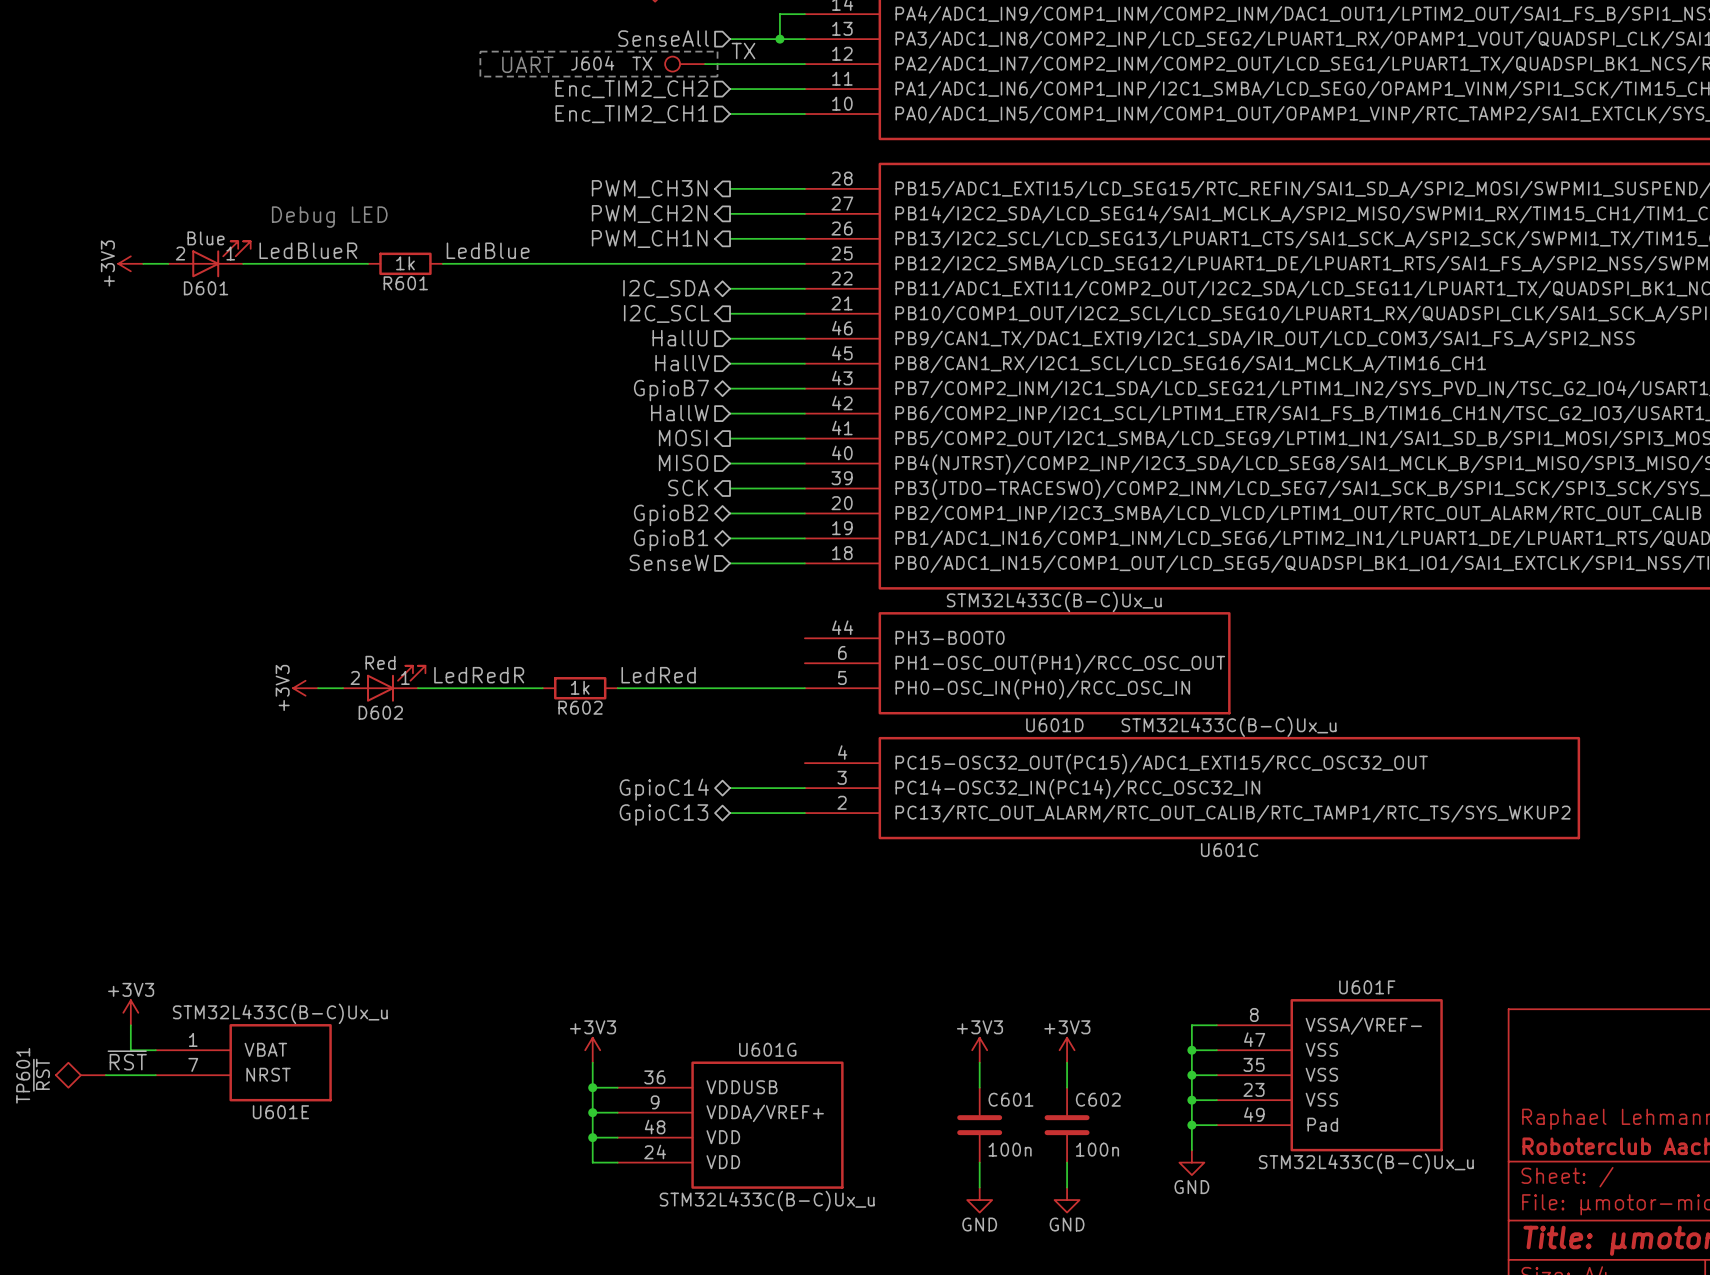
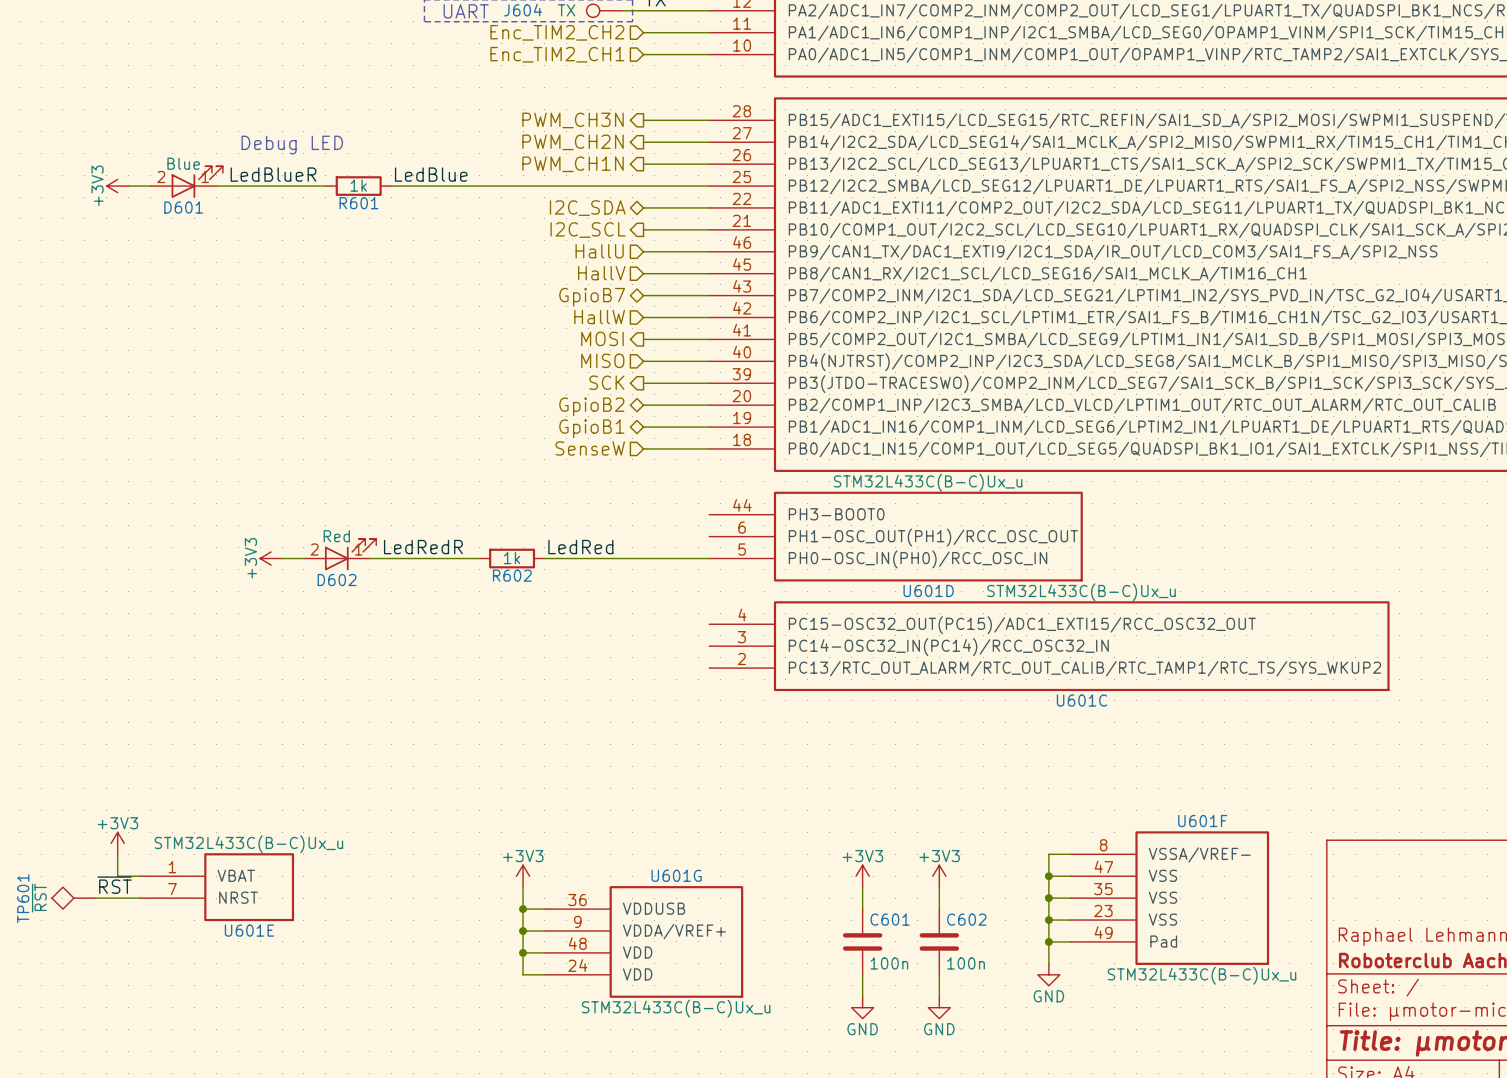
wire: (730, 788) (804, 788) -> none
hierarchical label: GpioC14 (664, 789) -> none
wire: (730, 813) (804, 813) -> none
hierarchical label: GpioC13 (663, 815) -> none

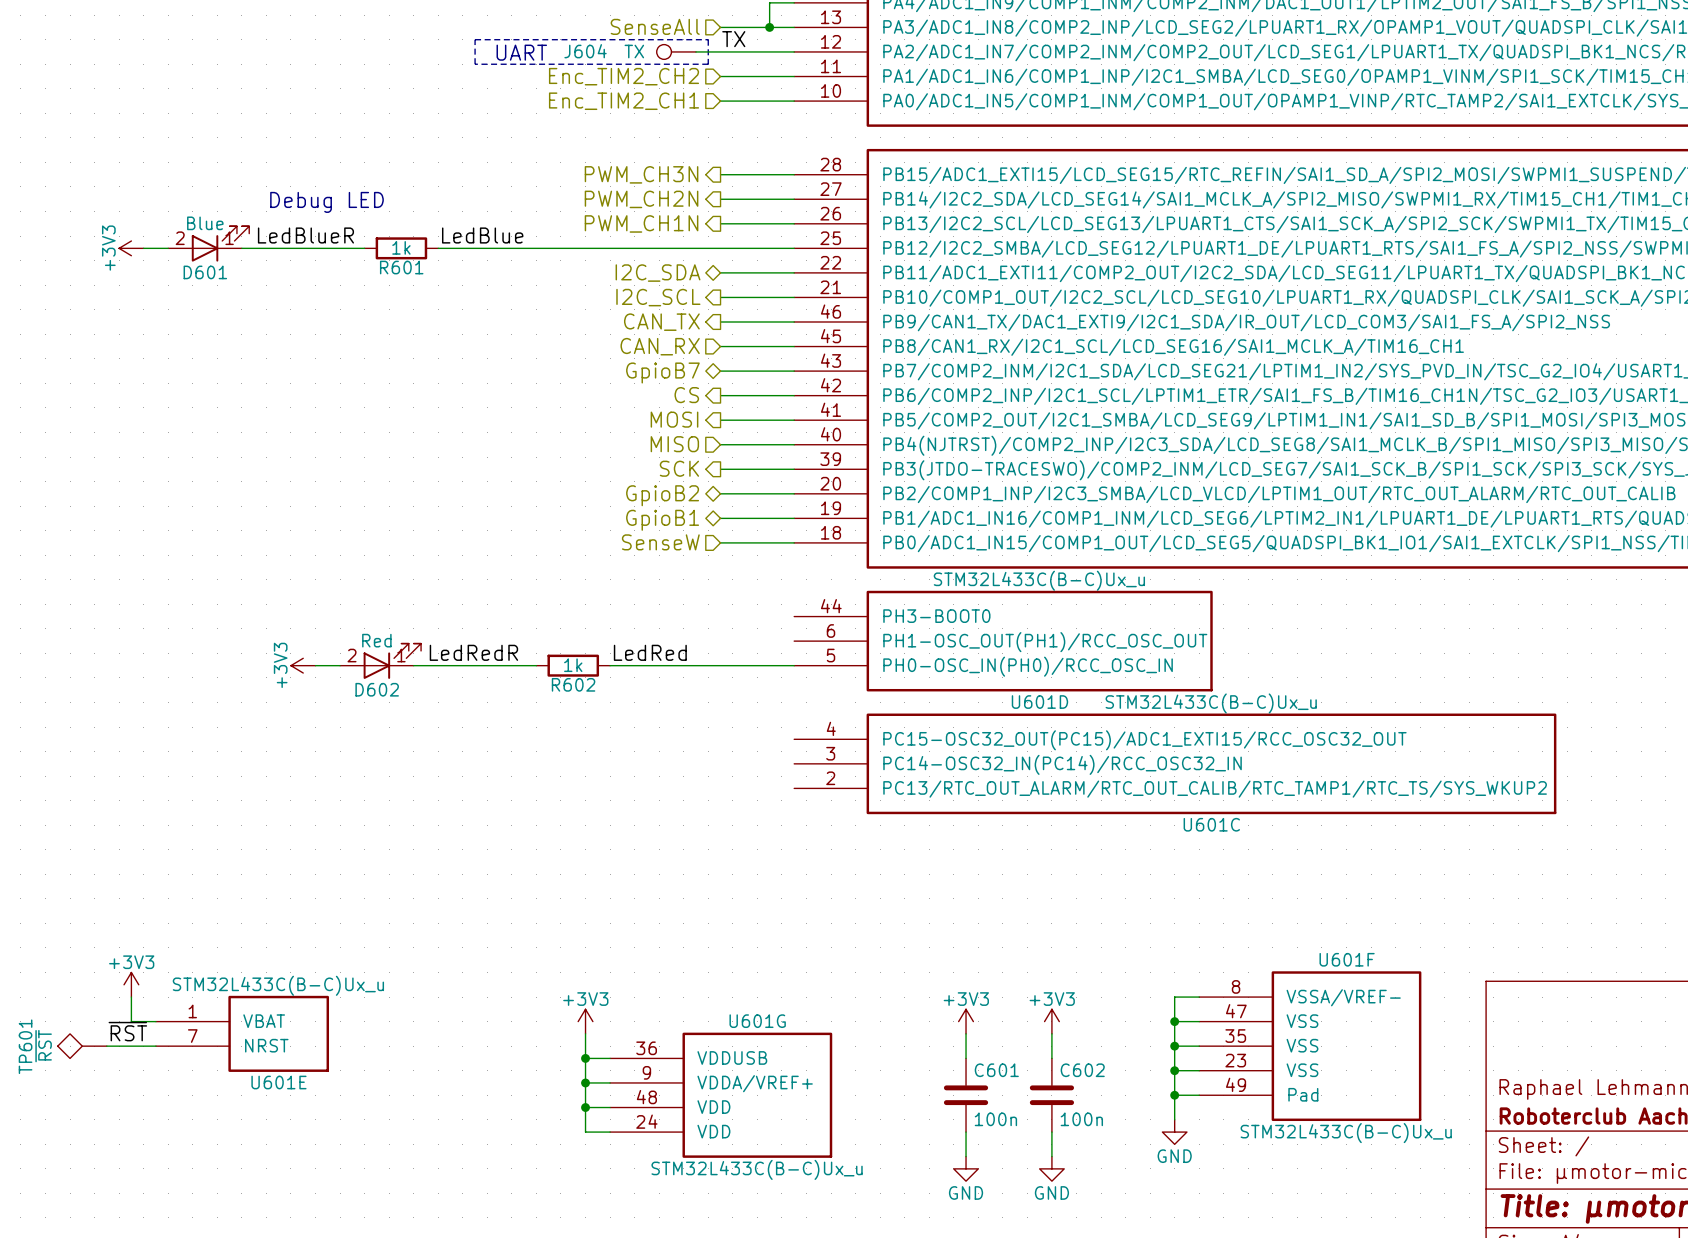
hierarchical label shape: input (599, 251) -> output (661, 322)
hierarchical label: HallU (599, 251) -> CAN_TX (661, 322)
hierarchical label: HallV (601, 273) -> CAN_RX (660, 346)
hierarchical label shape: input (599, 317) -> output (686, 395)
hierarchical label: HallW (599, 317) -> CS (686, 395)

